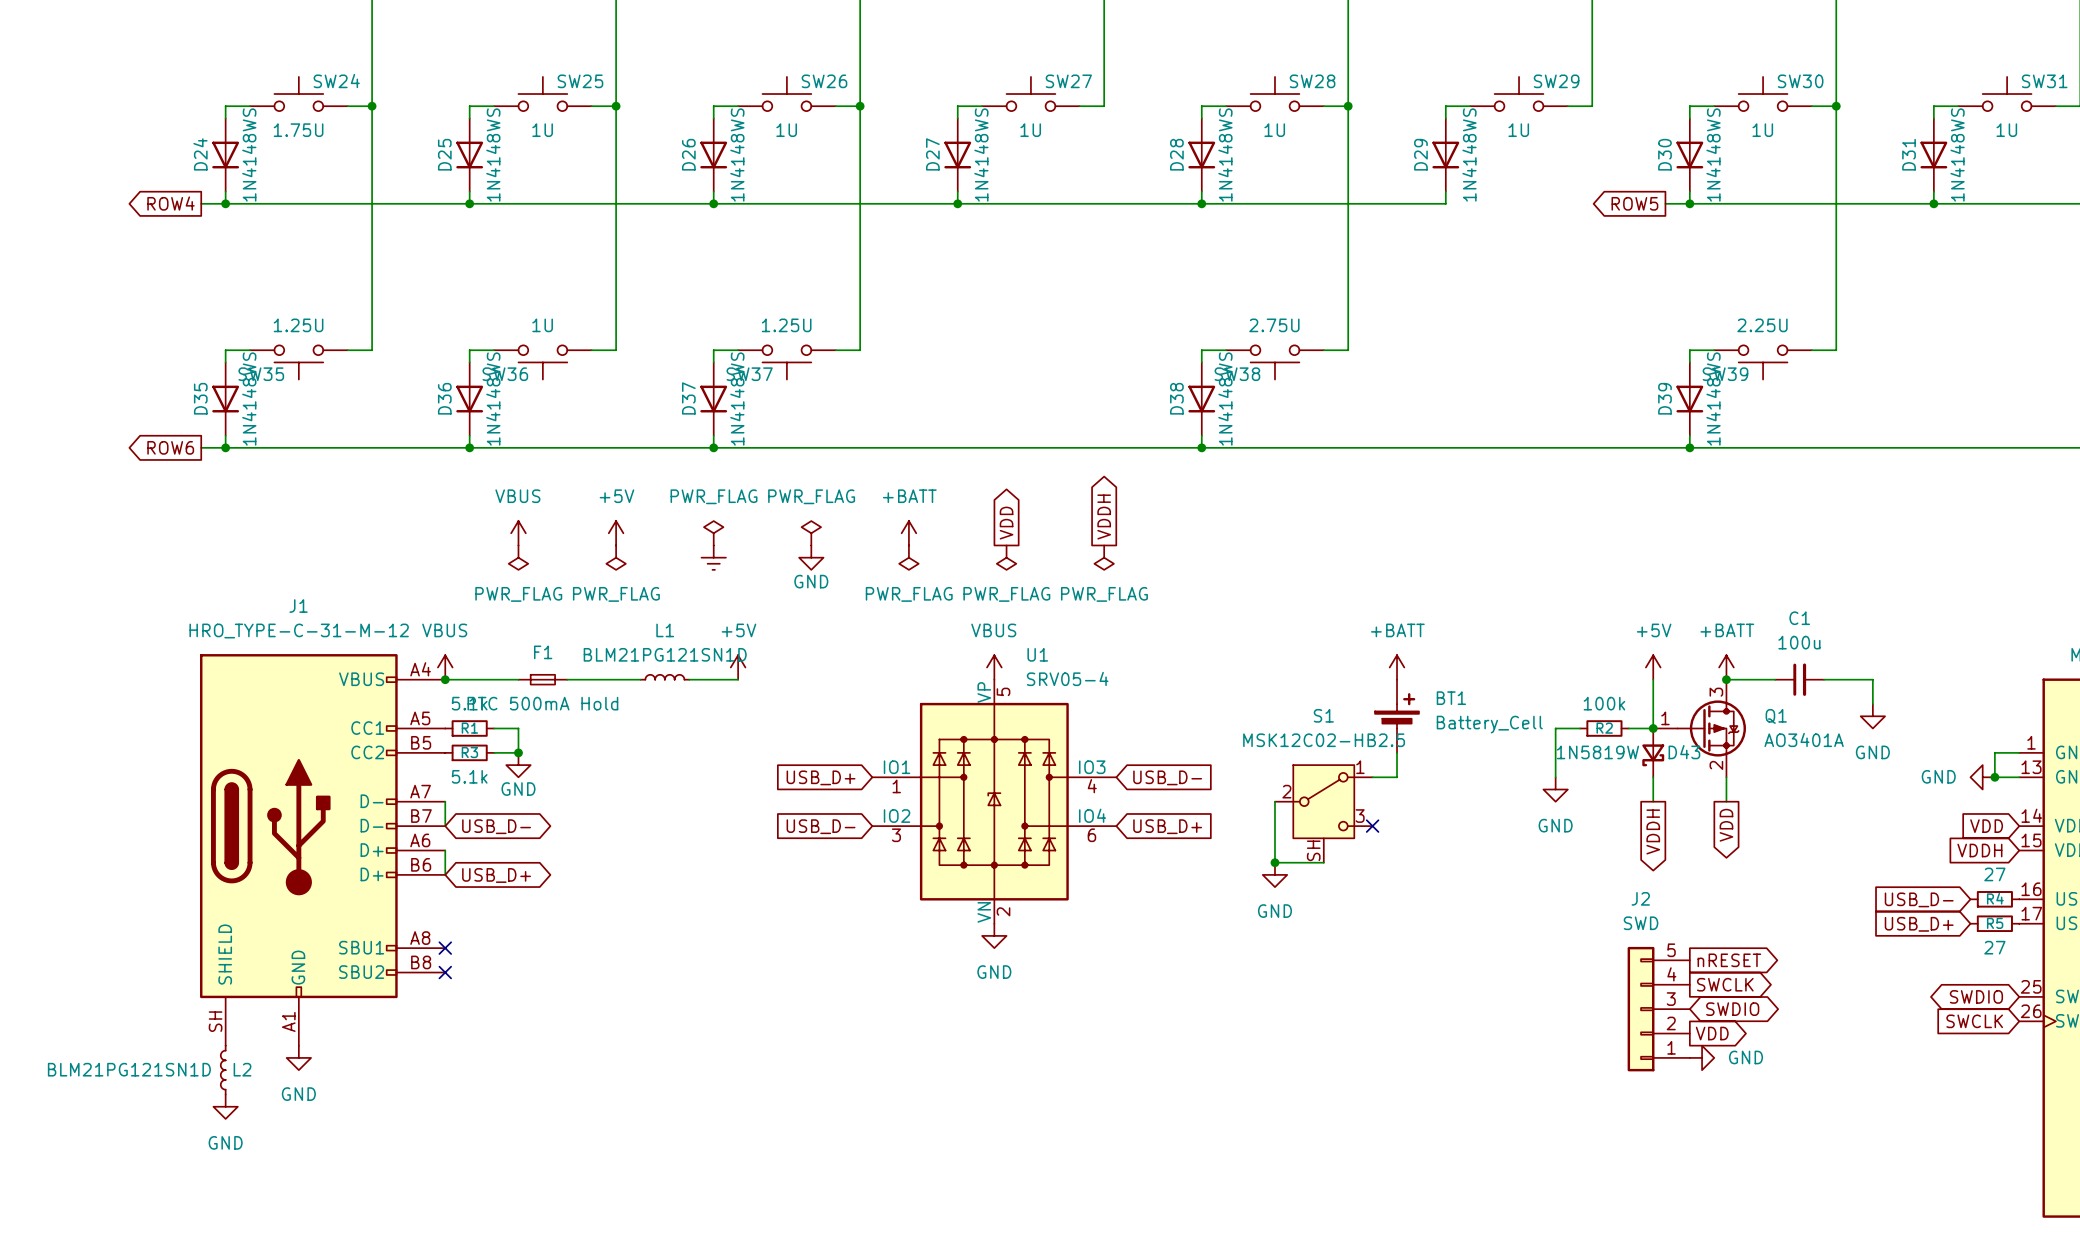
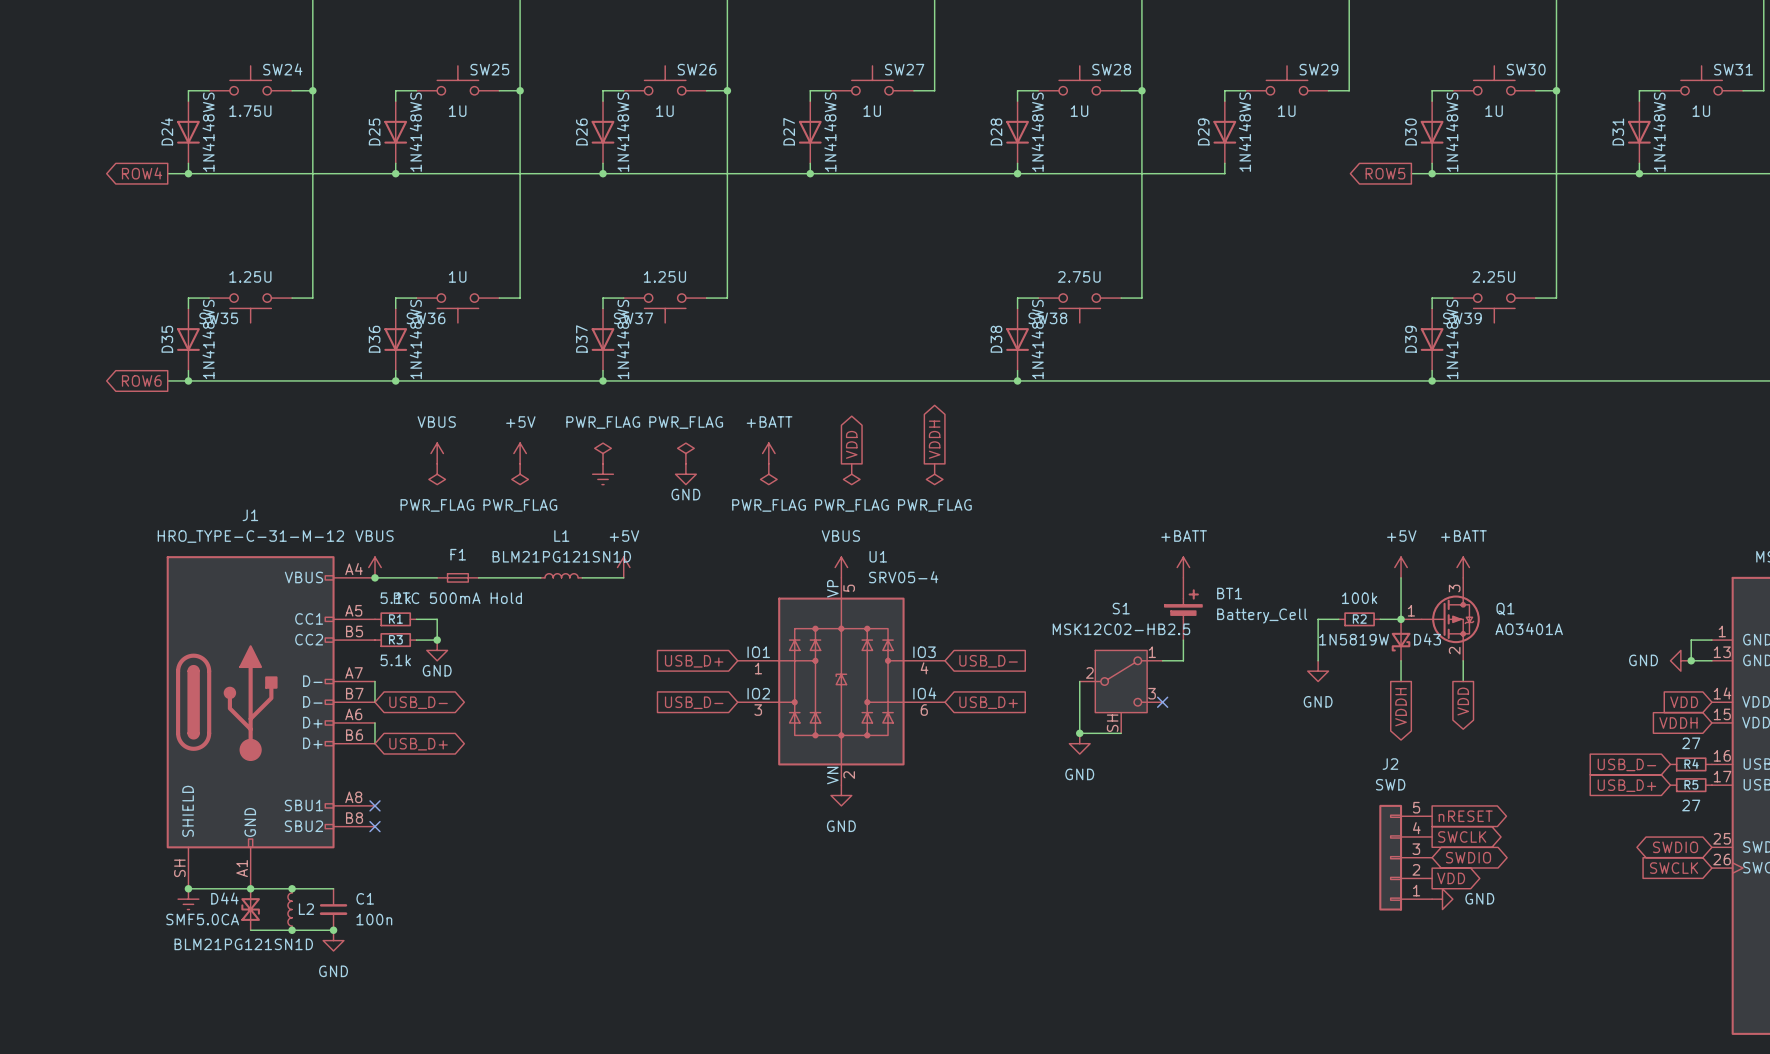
C1 name position: C1 (1799, 618) -> C1 (365, 898)
C1 value: 100u (1799, 642) -> 100n (374, 919)
wire: (1726, 679) (1775, 679) -> none
junction: (1726, 679) -> none
C1 rotation: 0° (1799, 679) -> 90° clockwise (333, 909)
C1 position: (1799, 679) -> (333, 909)
wire: (1824, 679) (1872, 679) (1872, 704) -> none
power symbol: GND (1872, 716) -> none
wire: none -> (188, 888) (333, 888)
junction: none -> (188, 888)
junction: none -> (250, 888)
junction: none -> (292, 888)
power symbol: none -> (188, 899)
power symbol: GND (298, 1057) -> none
L2 value position: BLM21PG121SN1D (129, 1069) -> BLM21PG121SN1D (243, 944)
L2 position: (223, 1070) -> (290, 909)
D44: none -> SMF5.0CA (250, 909)
wire: none -> (250, 930) (333, 930)
junction: none -> (292, 930)
junction: none -> (333, 930)
power symbol: GND (225, 1106) -> none
power symbol: none -> GND (333, 940)

